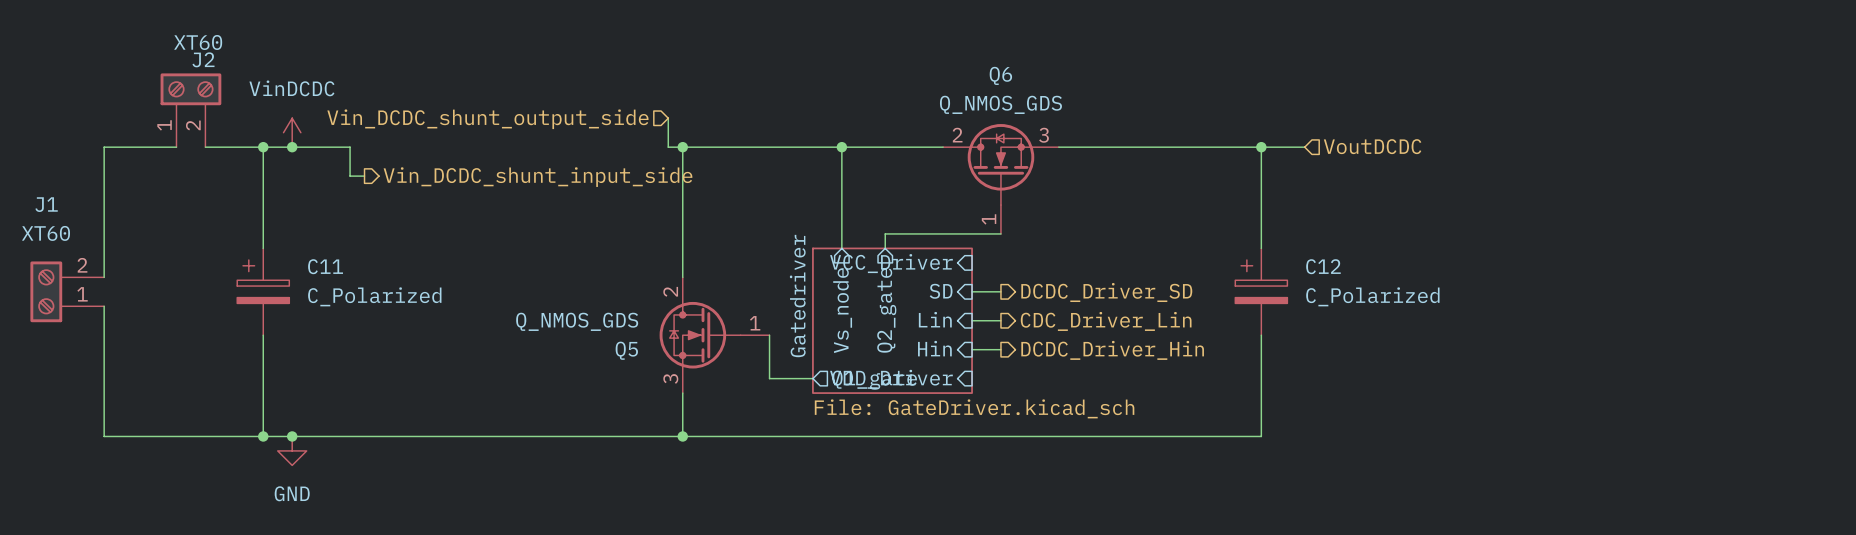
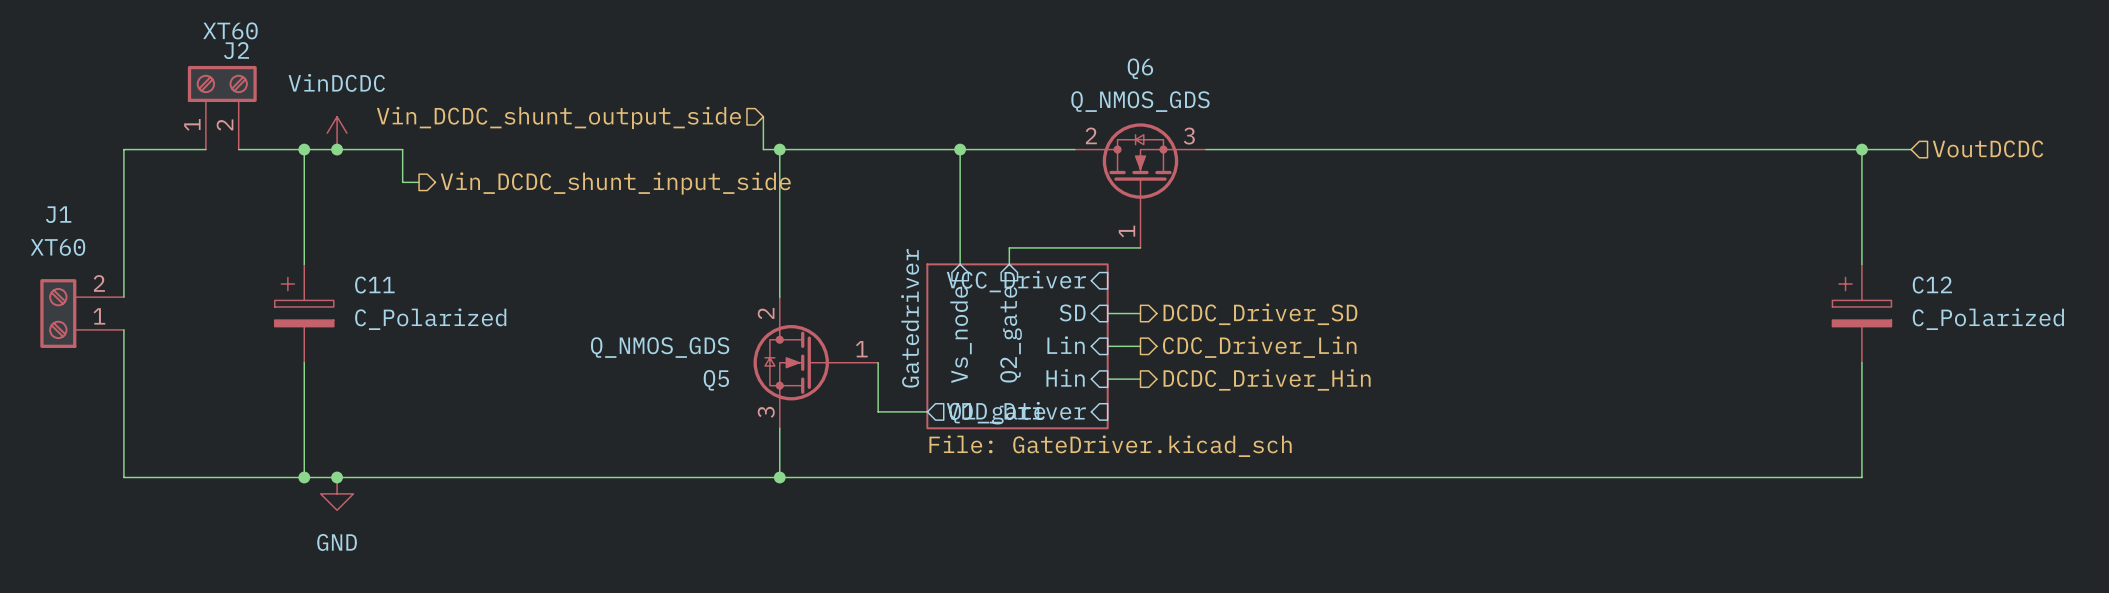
hierarchical label: VoutDCDC (1372, 146) -> none
hierarchical label: none -> VoutDCDC (1988, 148)
wire: (1261, 147) (1261, 248) -> none
junction: (1261, 147) -> none
wire: none -> (1484, 149) (1911, 149)
wire: none -> (1861, 149) (1861, 264)
junction: none -> (1861, 149)
C12 position: (1261, 291) -> (1861, 313)
wire: (1261, 335) (1261, 436) -> (1861, 362) (1861, 477) (1435, 477)

